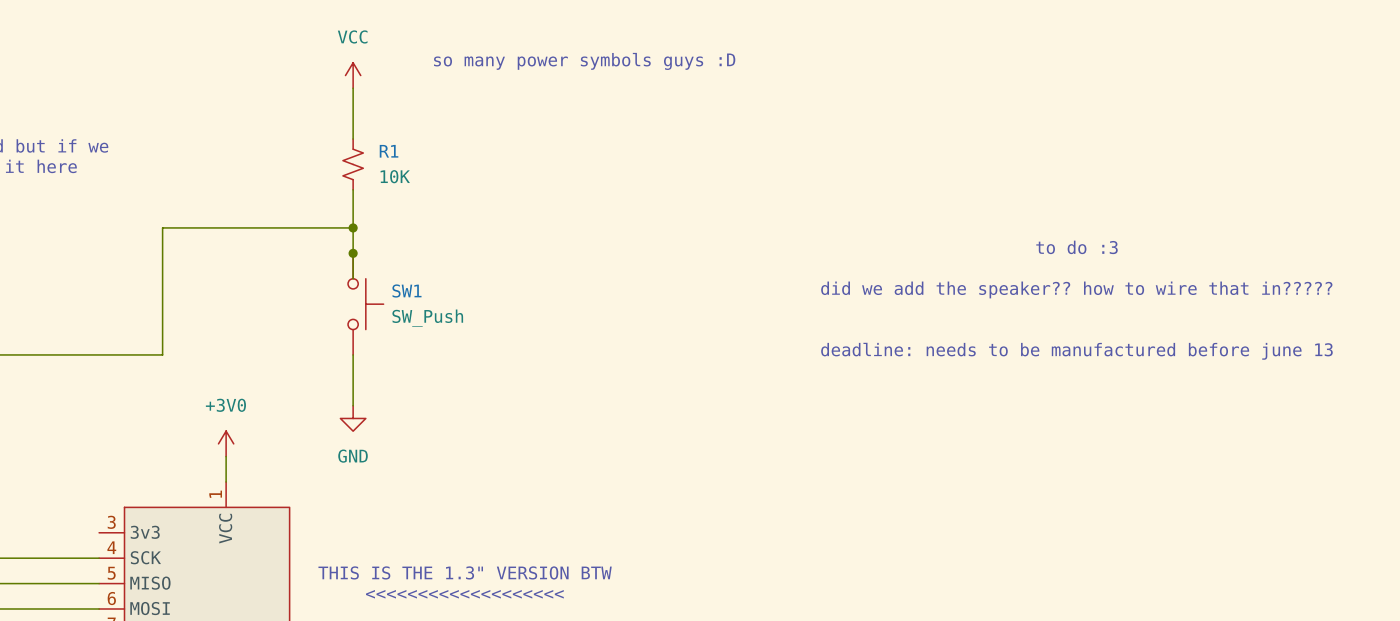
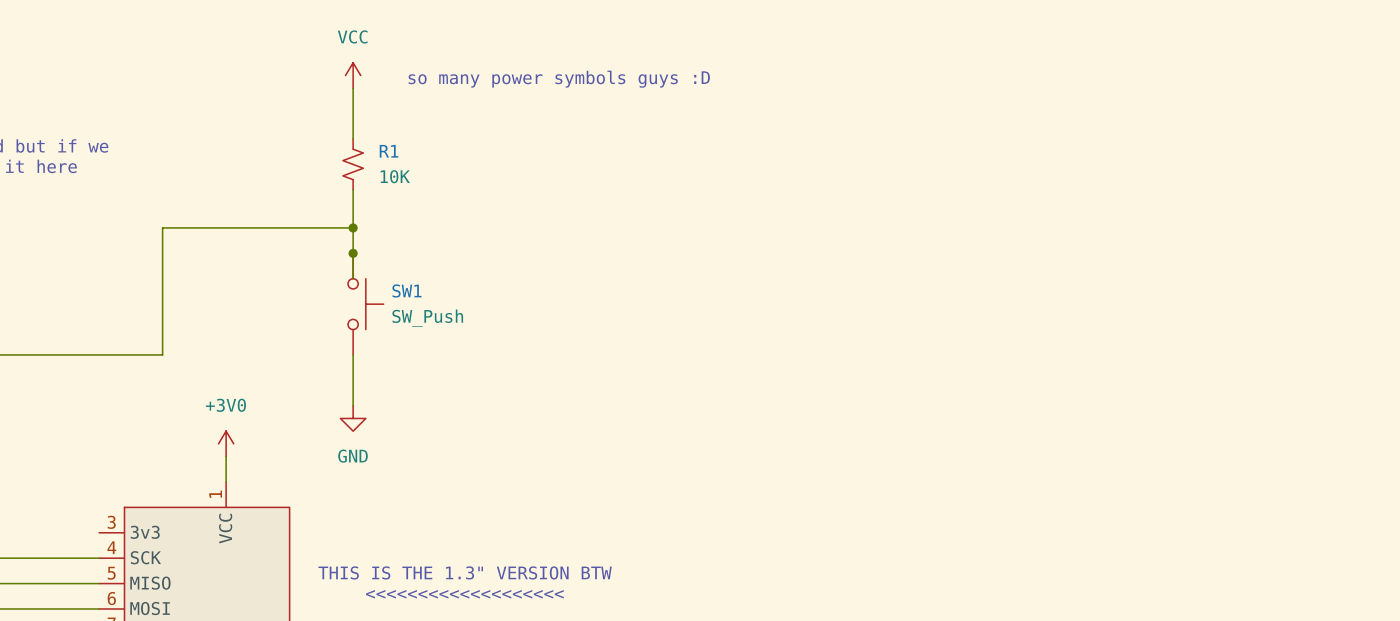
text position: so many power symbols guys :D (584, 61) -> so many power symbols guys :D (559, 79)
text: to do :3 (1077, 247) -> none
text: did we add the speaker?? how to wire that in????? (1076, 289) -> none
text: deadline: needs to be manufactured before june 13 (1076, 351) -> none

